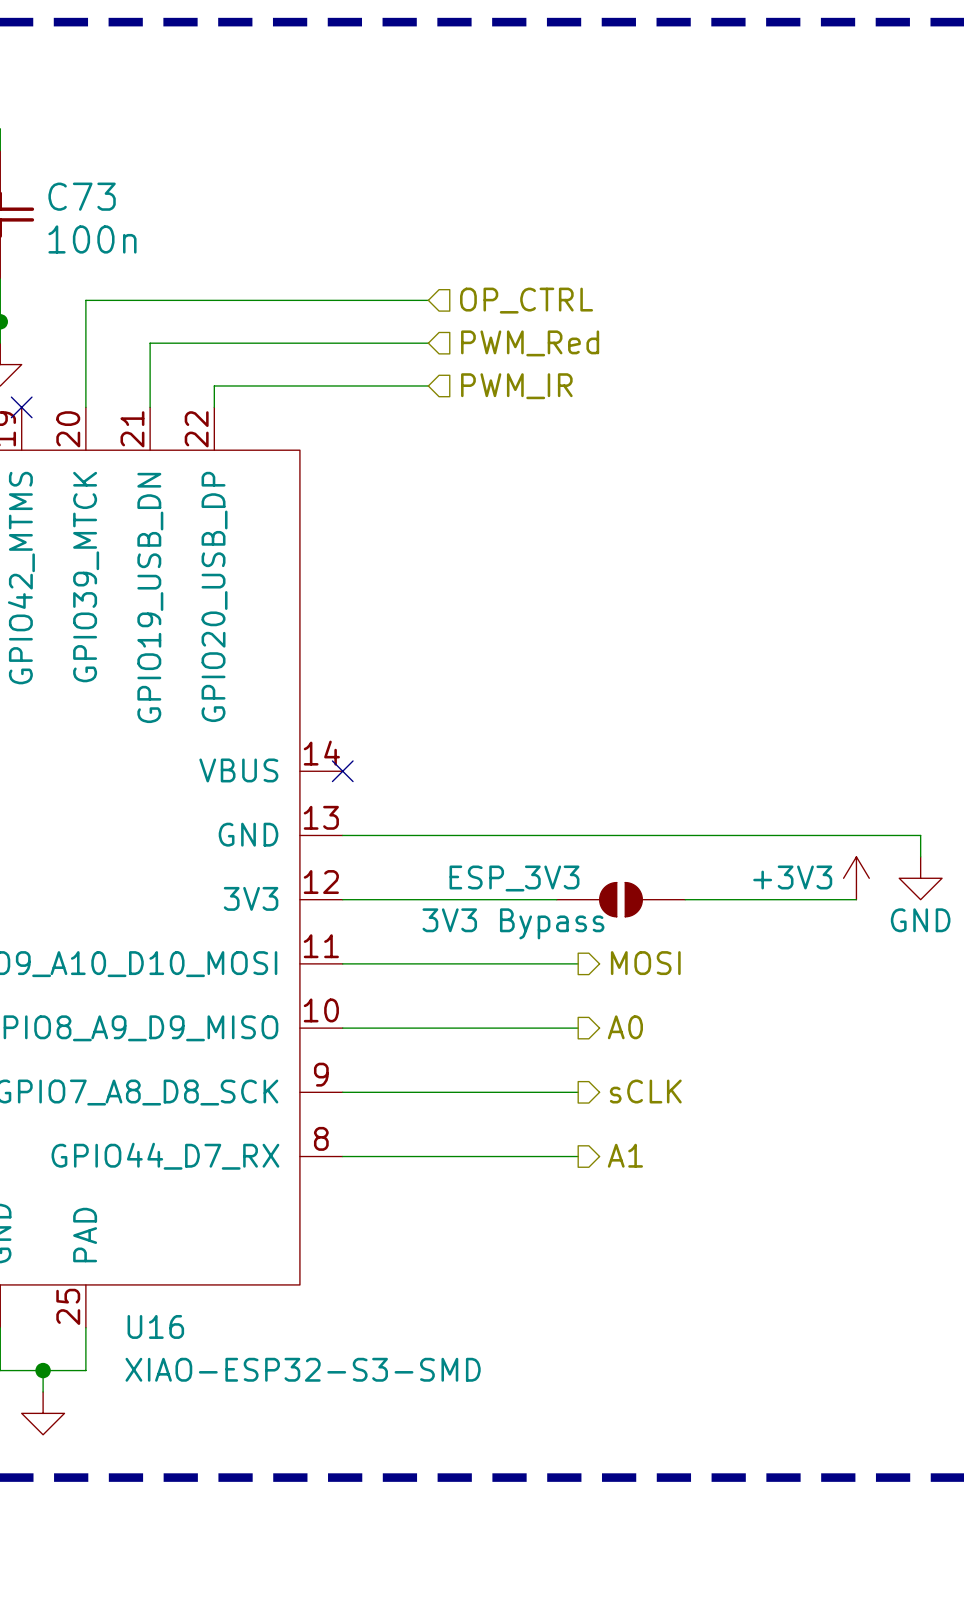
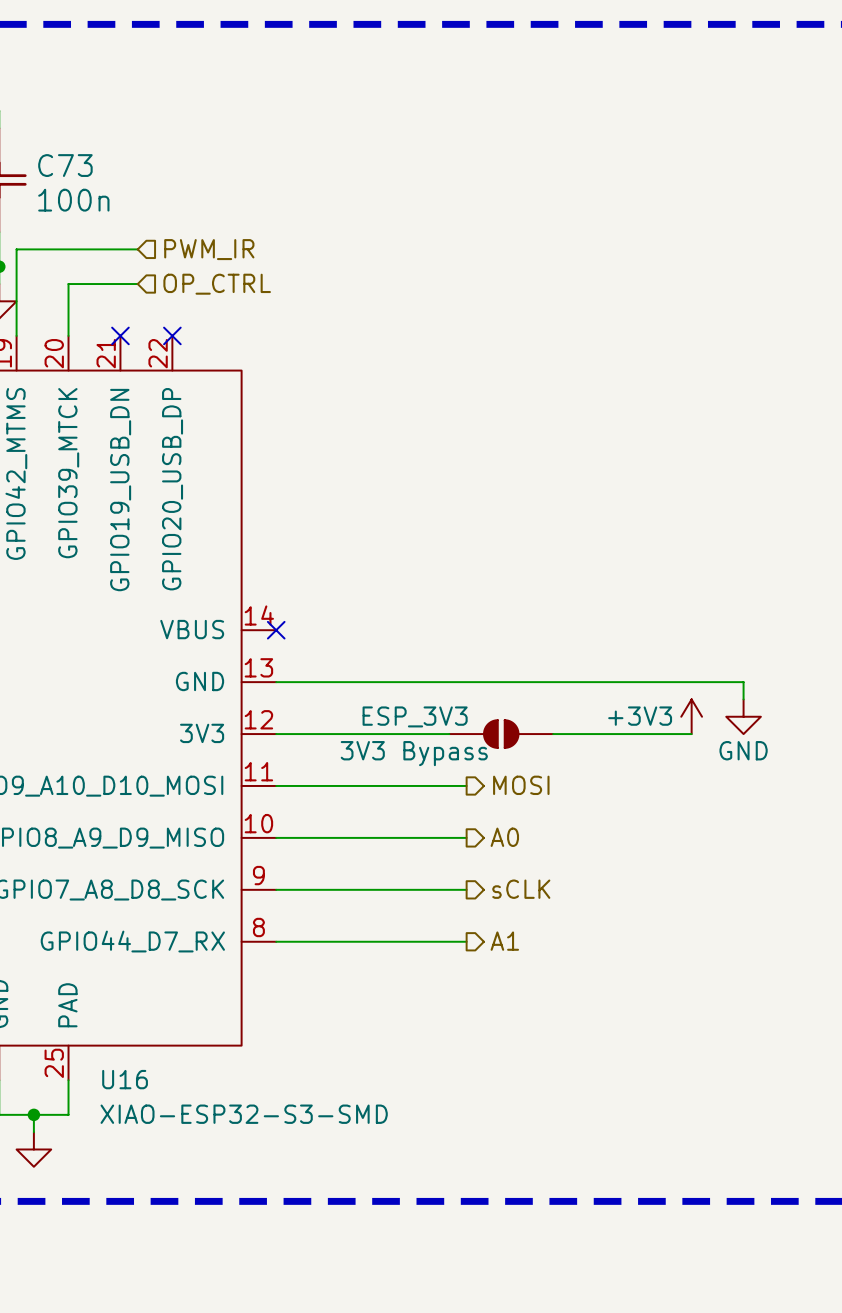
wire: (85, 300) (85, 343) -> (120, 284) (68, 284)
wire: none -> (68, 249) (16, 249) (16, 335)
wire: (171, 300) (428, 300) -> none
hierarchical label position: OP_CTRL (526, 300) -> OP_CTRL (217, 284)
wire: (150, 343) (150, 407) -> none
wire: (171, 343) (428, 343) -> none
hierarchical label: PWM_Red (530, 343) -> none
wire: (428, 385) (214, 385) (214, 407) -> none
hierarchical label position: PWM_IR (516, 386) -> PWM_IR (209, 249)
no-connect mark: (21, 407) -> none
no-connect mark: none -> (120, 335)
no-connect mark: none -> (172, 335)

